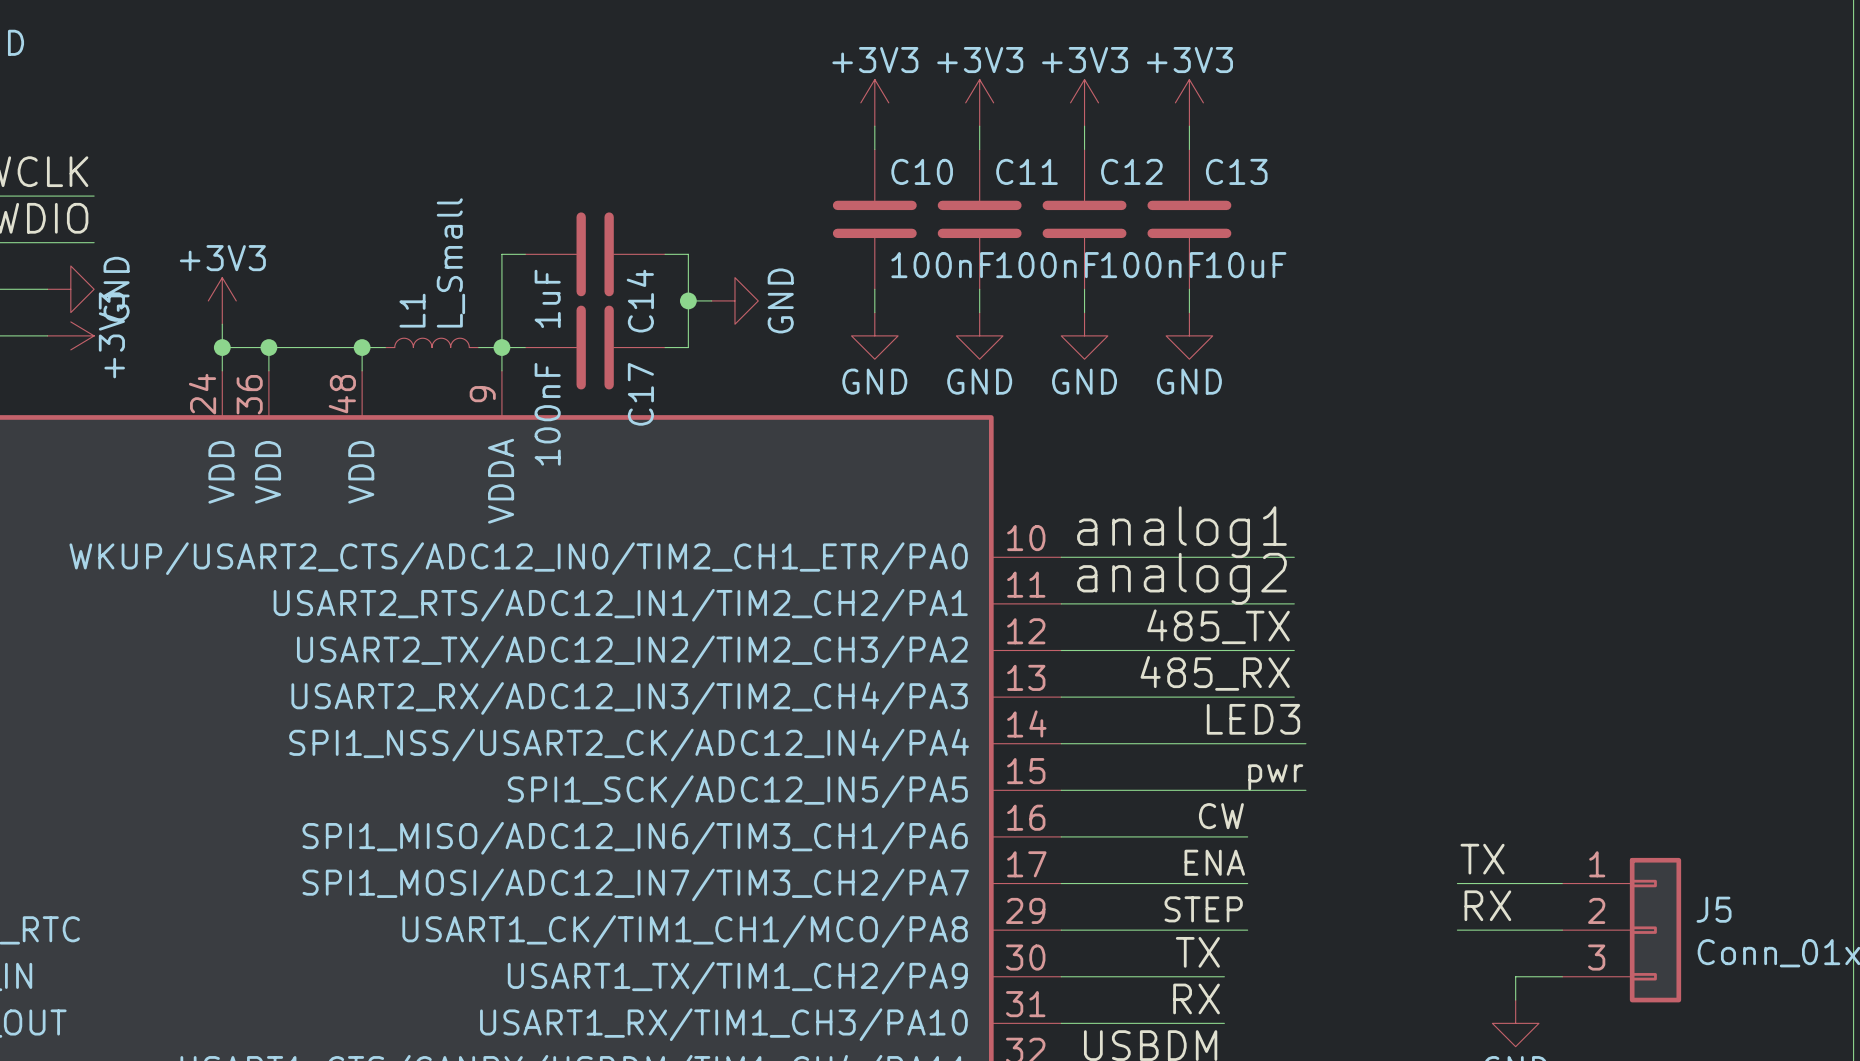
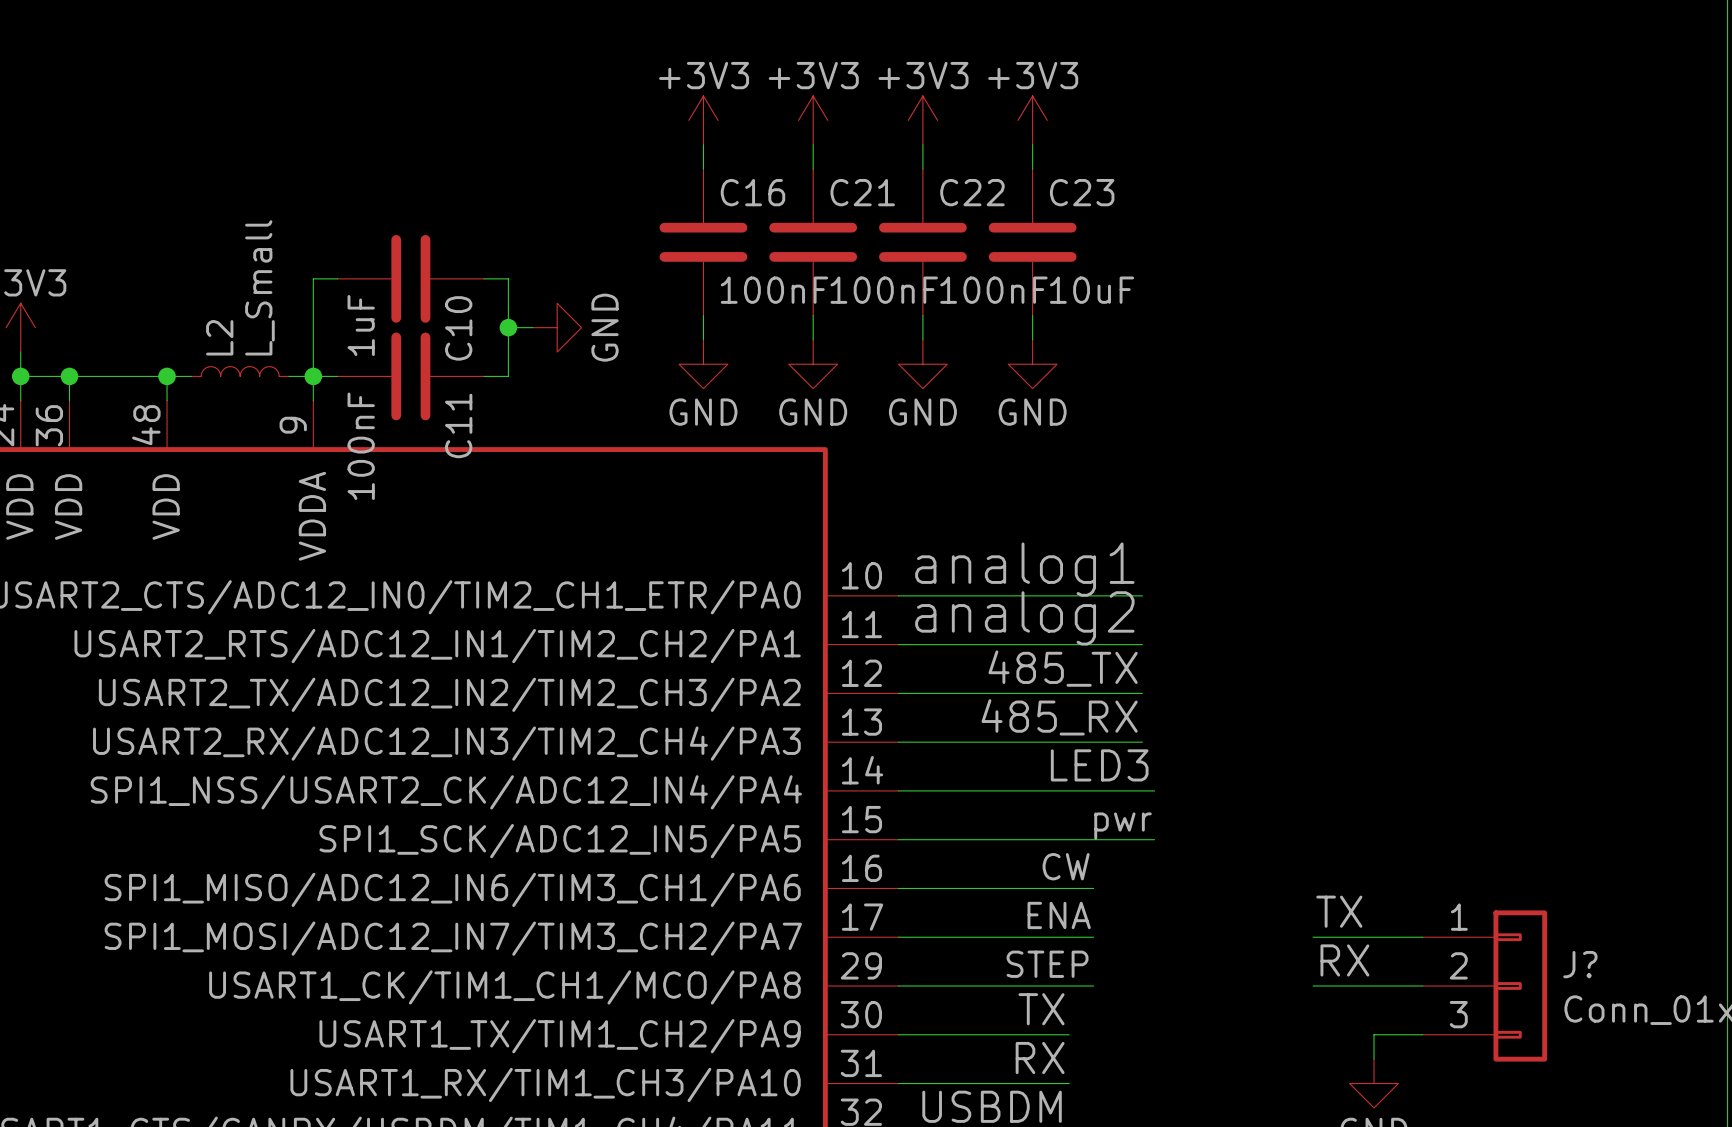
C10 name: C10 (922, 171) -> C16 (752, 192)
C11 name: C11 (1027, 171) -> C21 (862, 192)
C12 name: C12 (1131, 171) -> C22 (972, 192)
C13 name: C13 (1236, 171) -> C23 (1082, 192)
C14 name: C14 (640, 301) -> C10 (458, 328)
L1 name: L1 (412, 310) -> L2 (219, 337)
C17 name: C17 (640, 394) -> C11 (458, 425)
J5 name: J5 (1714, 909) -> J? (1580, 964)

